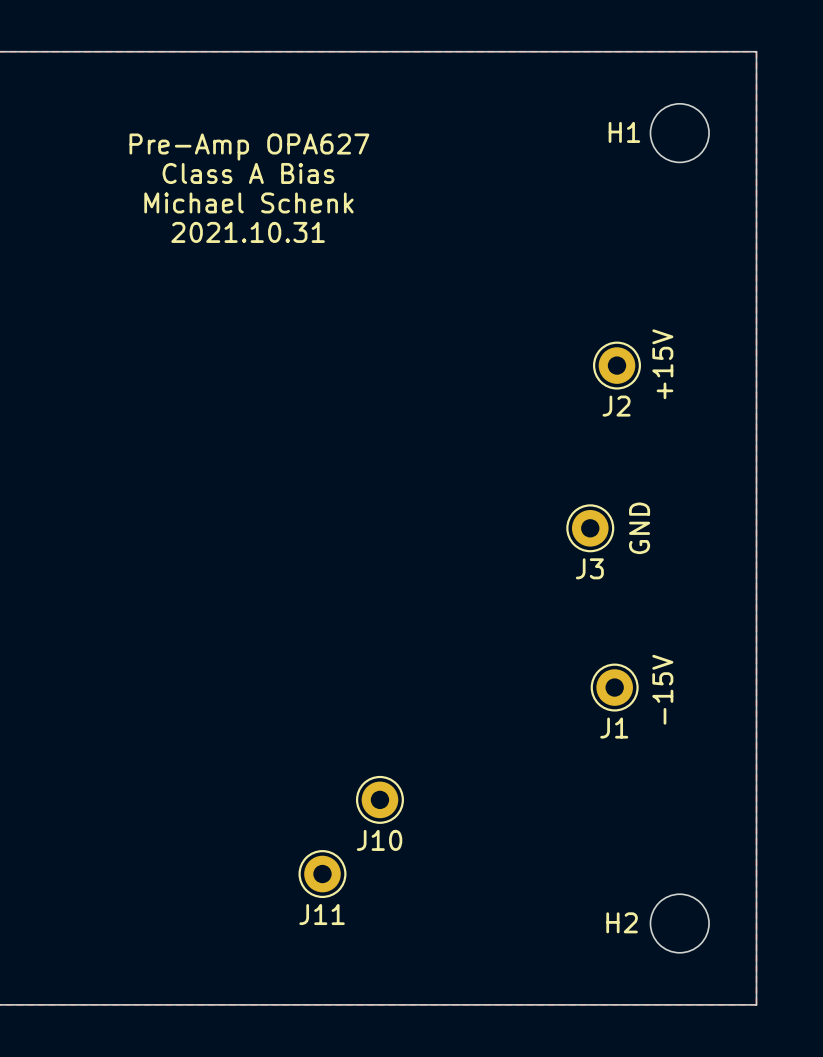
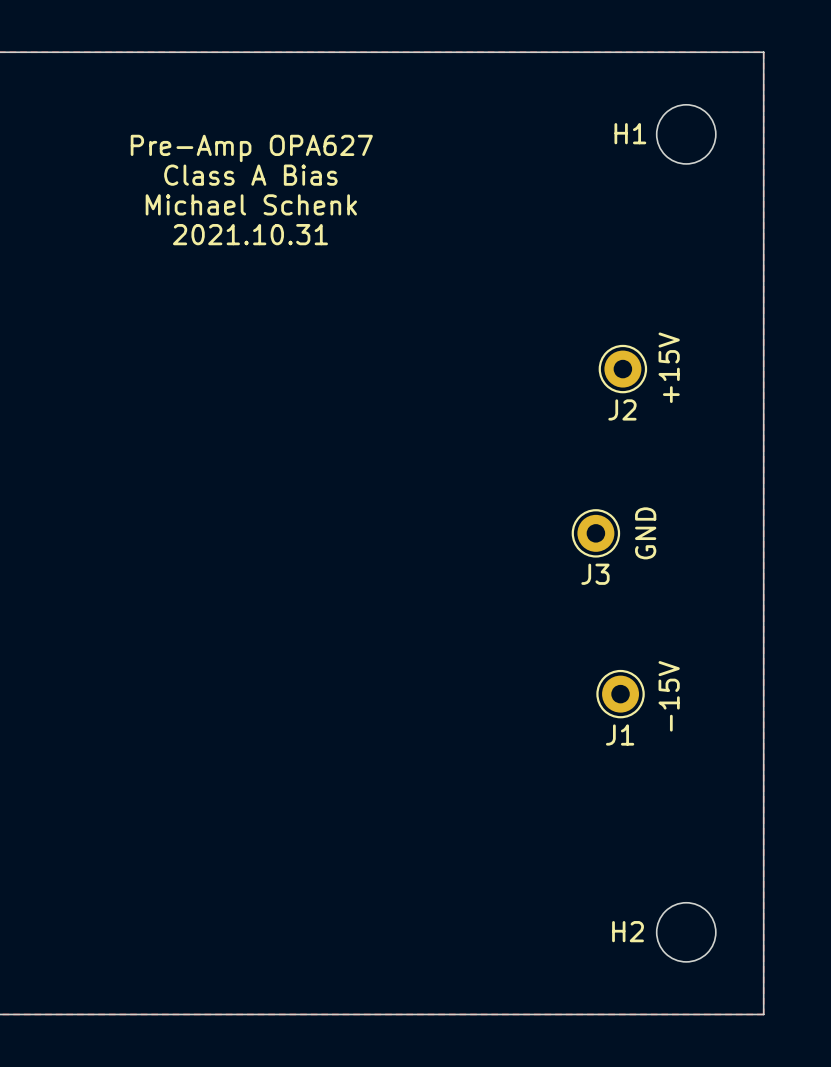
J10: (379, 799) -> none
J11: (322, 874) -> none

